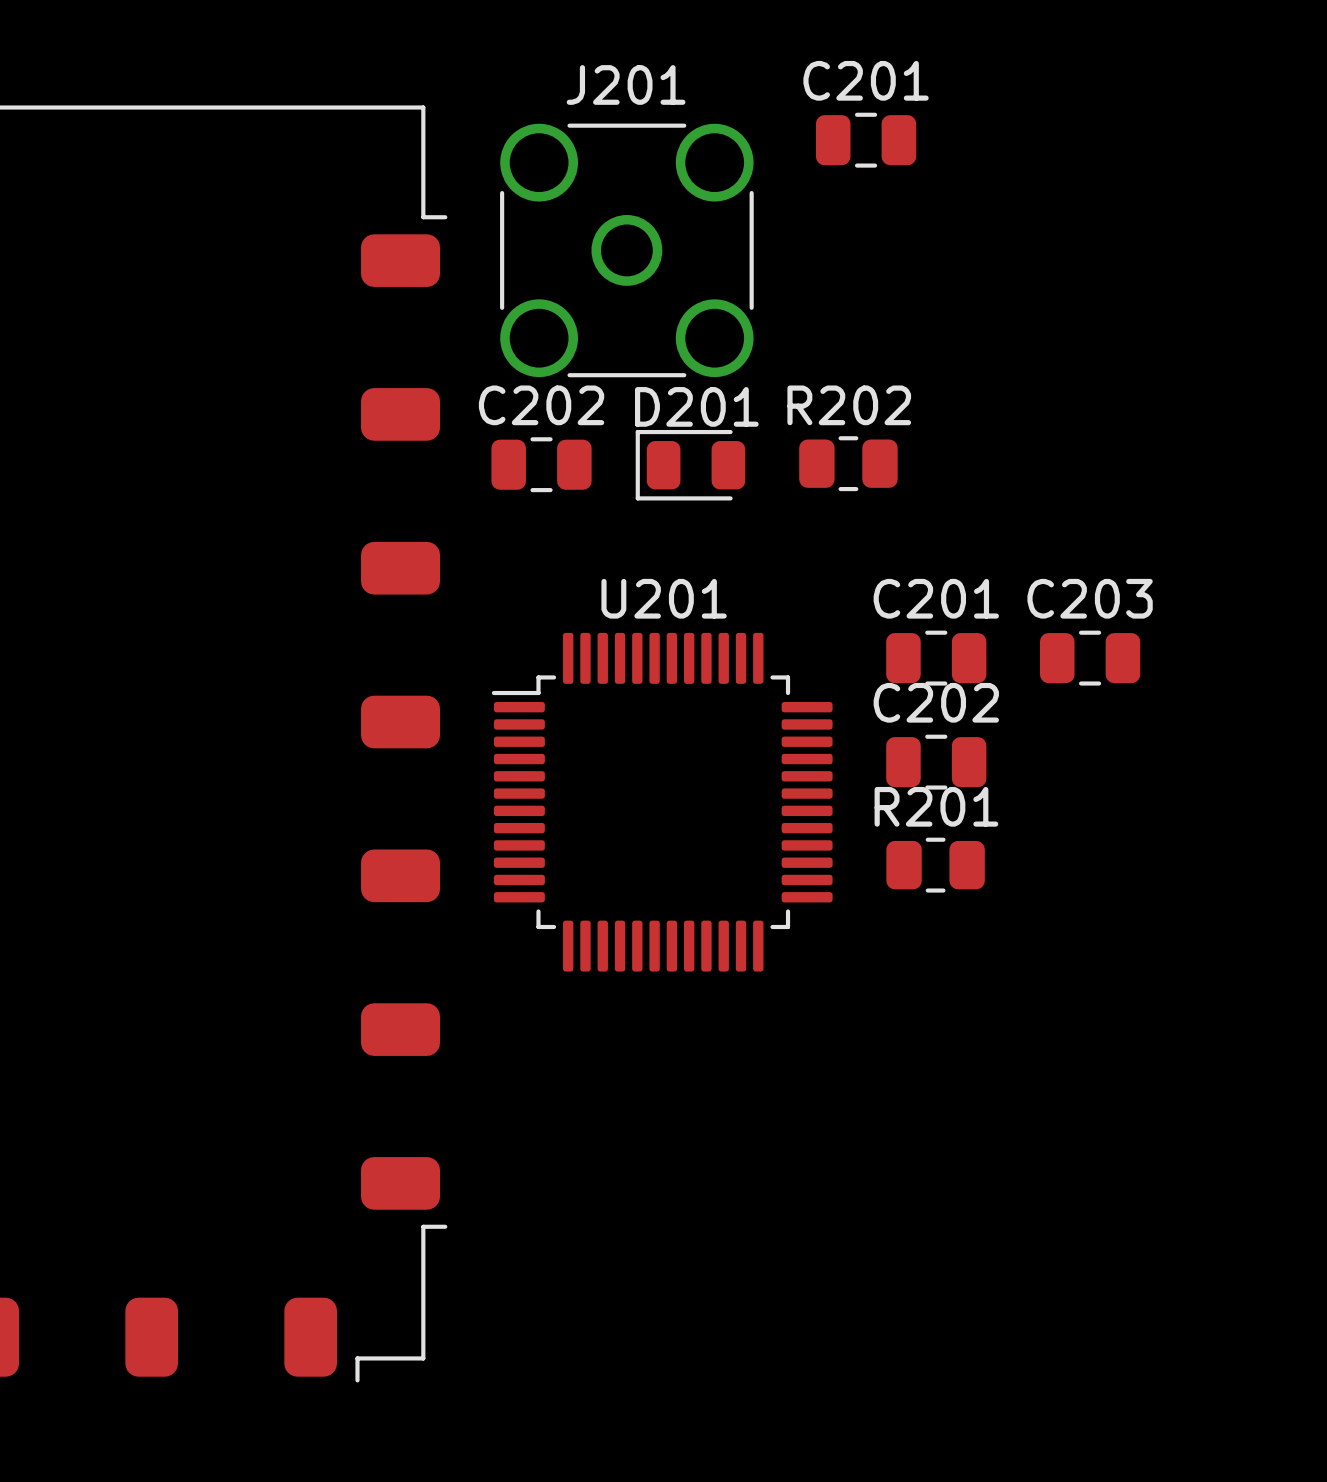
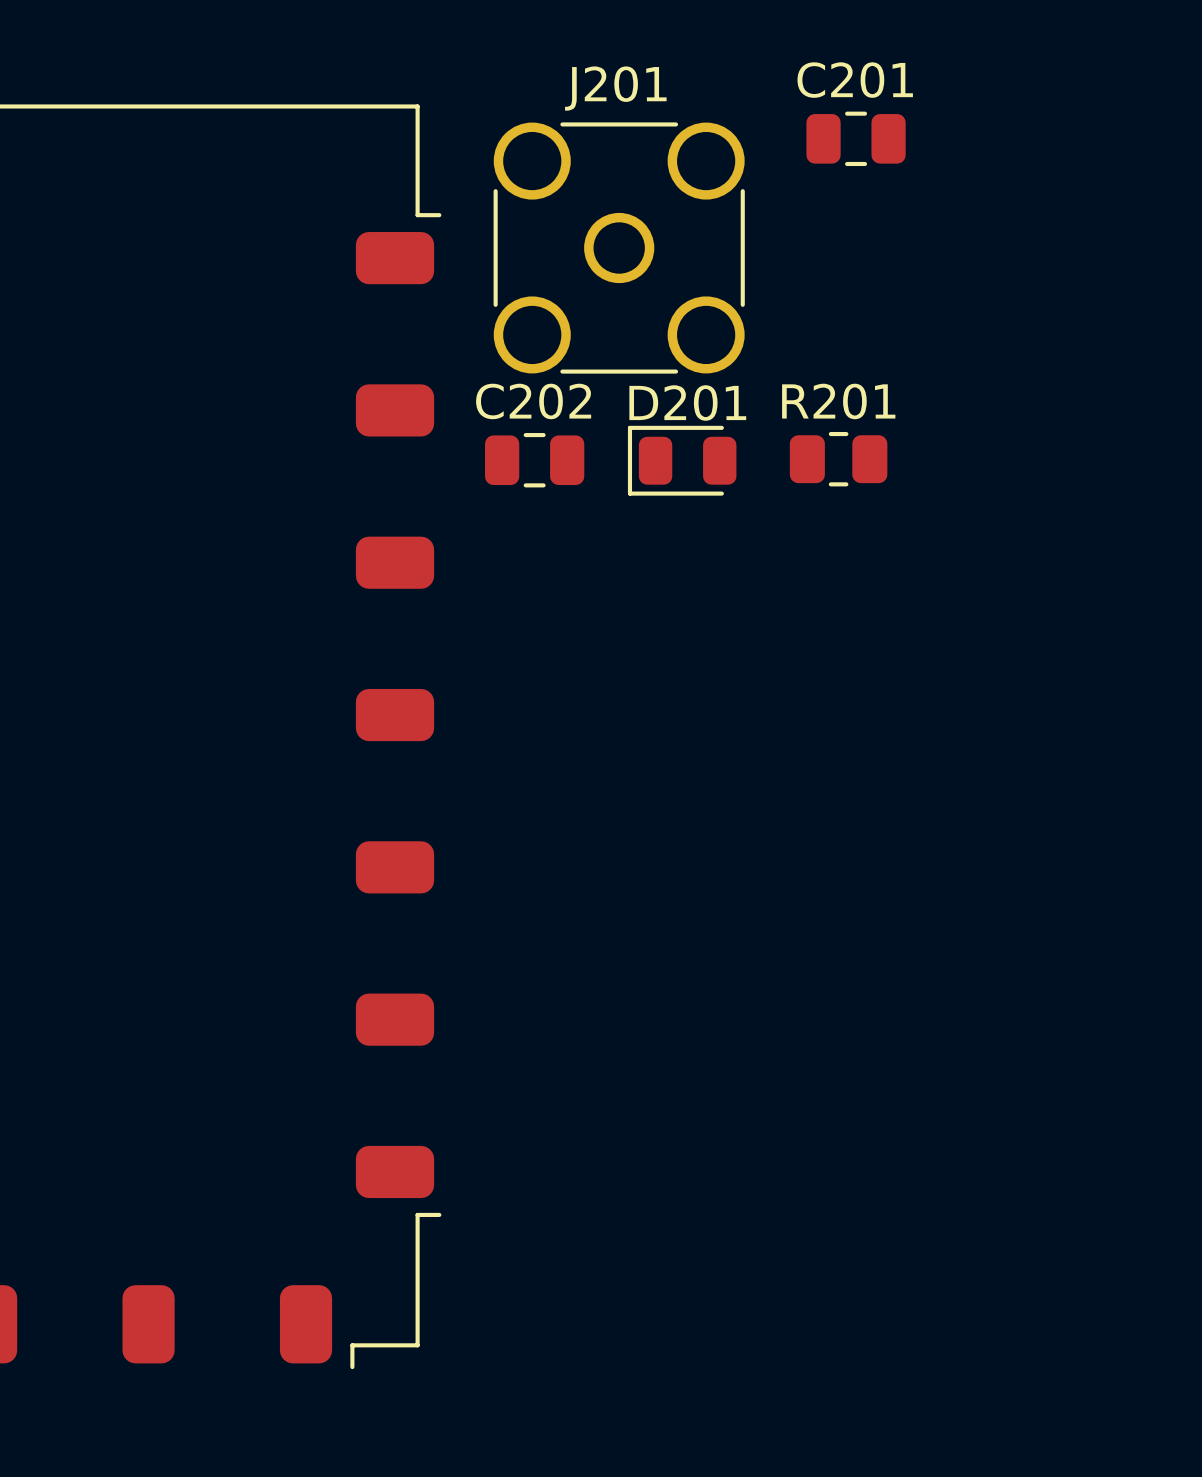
R202 name: R202 (849, 405) -> R201 (838, 401)
C201: (936, 658) -> none
C203: (1090, 658) -> none
C202: (936, 762) -> none
U201: (662, 802) -> none
R201: (935, 865) -> none

